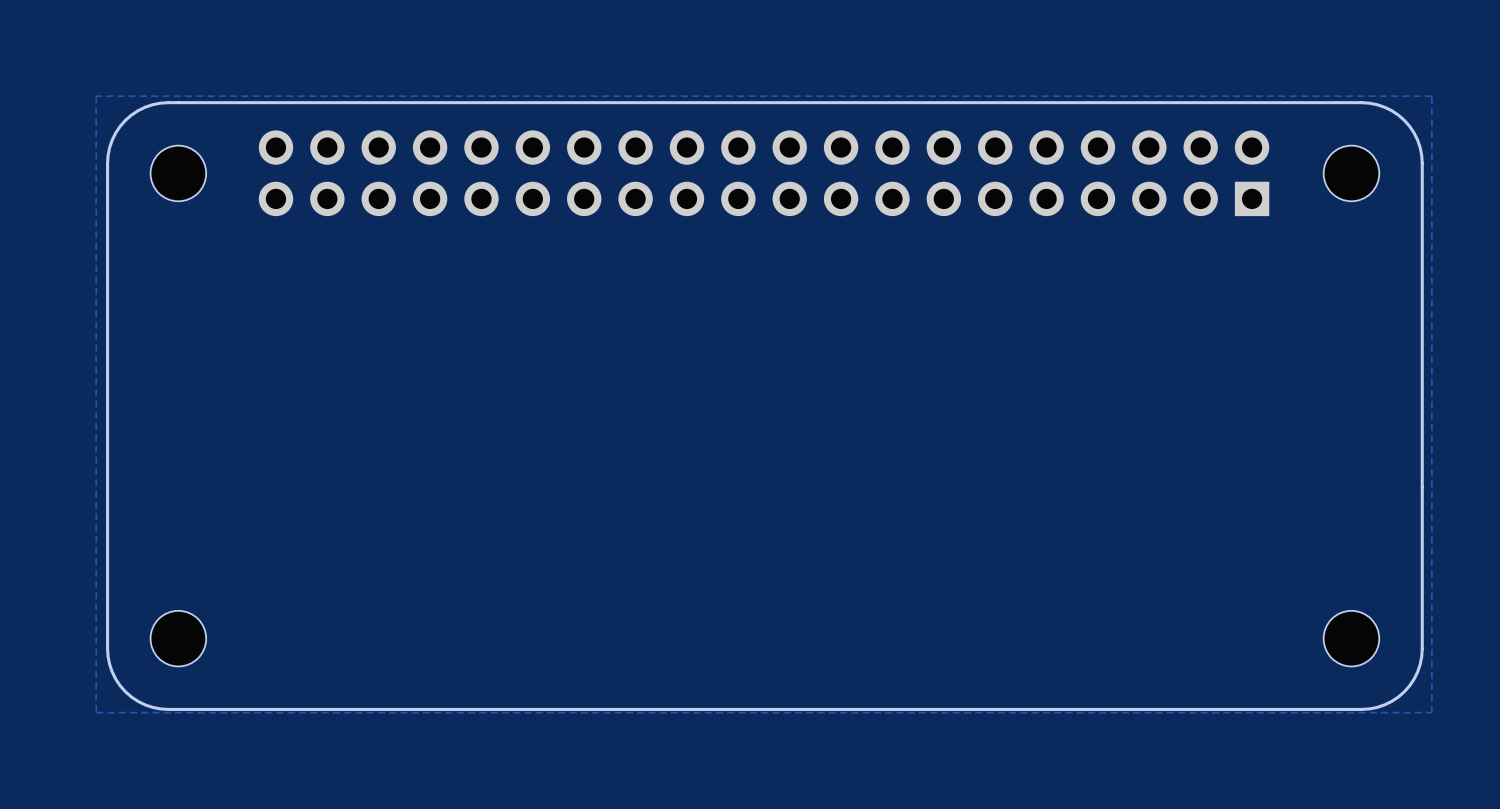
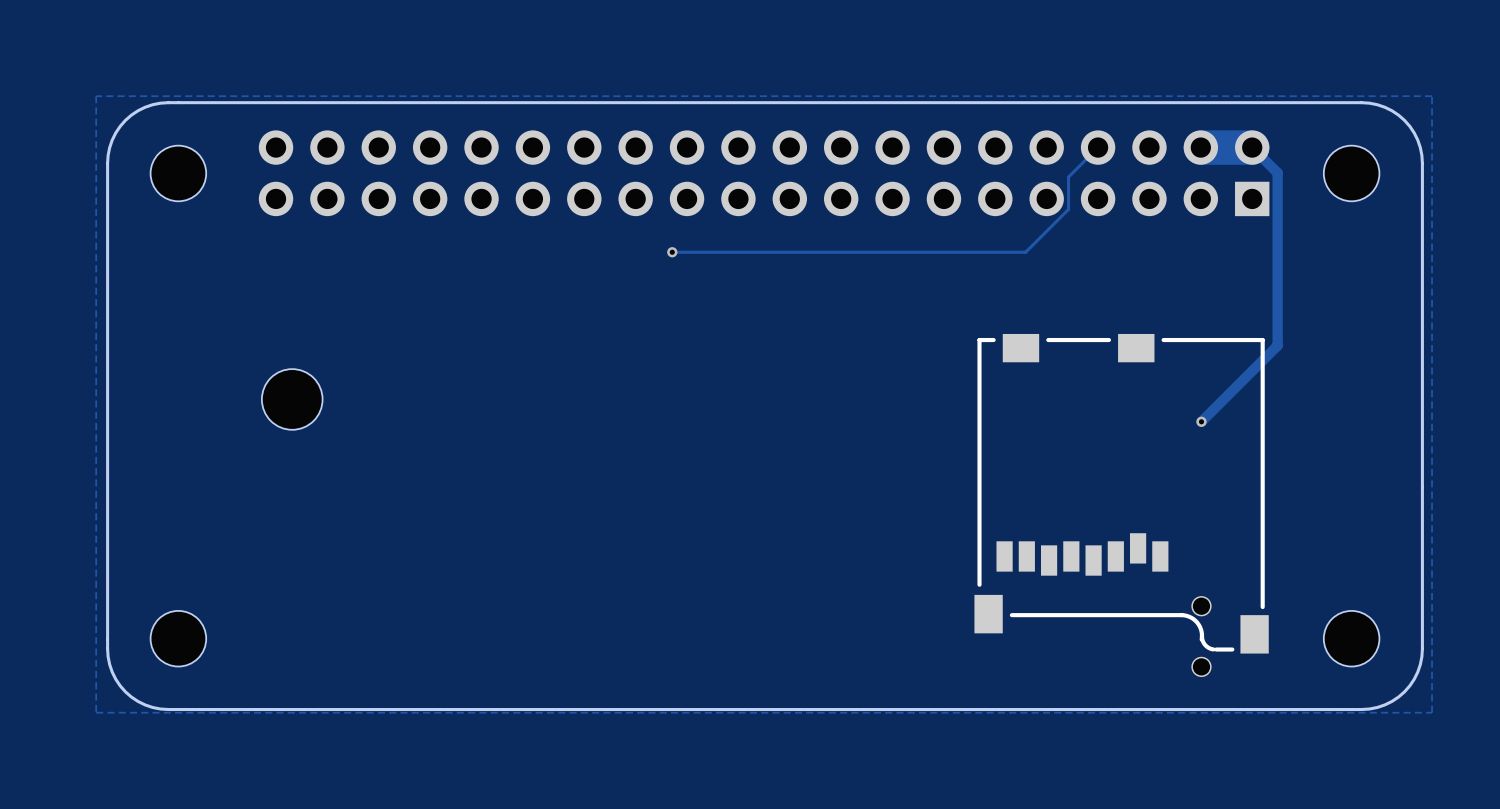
track: none -> (1098, 147) (1068, 177) (1068, 209) (1025, 252) (672, 252)
track: none -> (1200, 147) (1252, 147) (1277, 172) (1277, 345) (1201, 421)
via: none -> (672, 252)
part: none -> (292, 399)
via: none -> (1201, 421)
part: none -> (1121, 493)
part: none -> (1201, 636)

